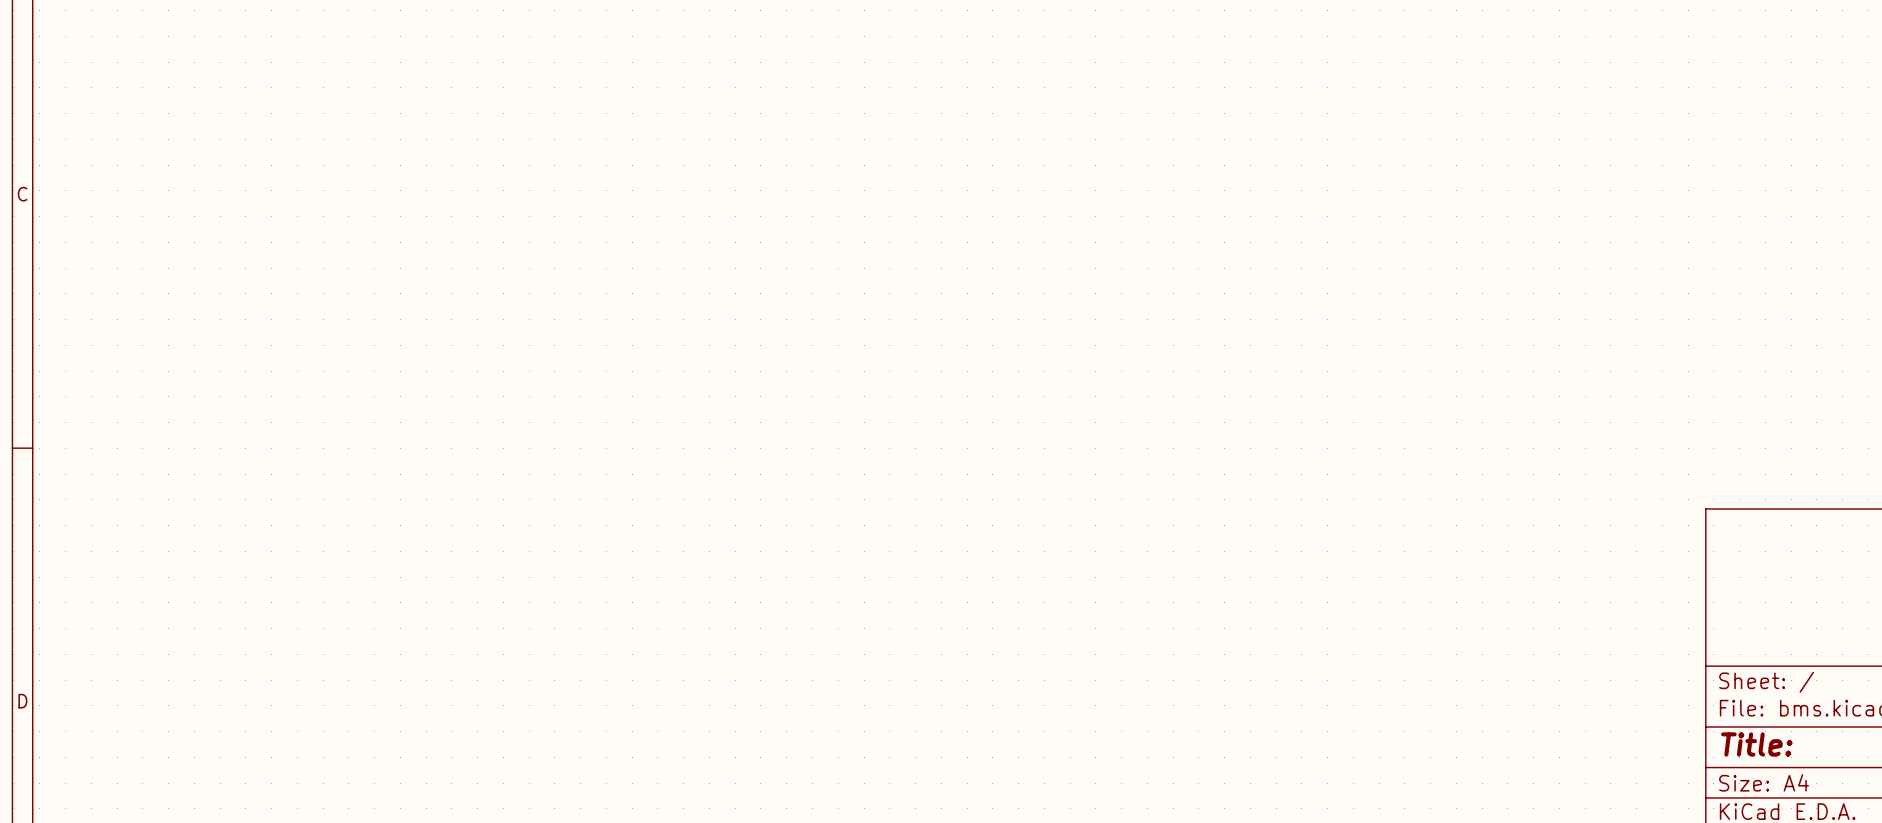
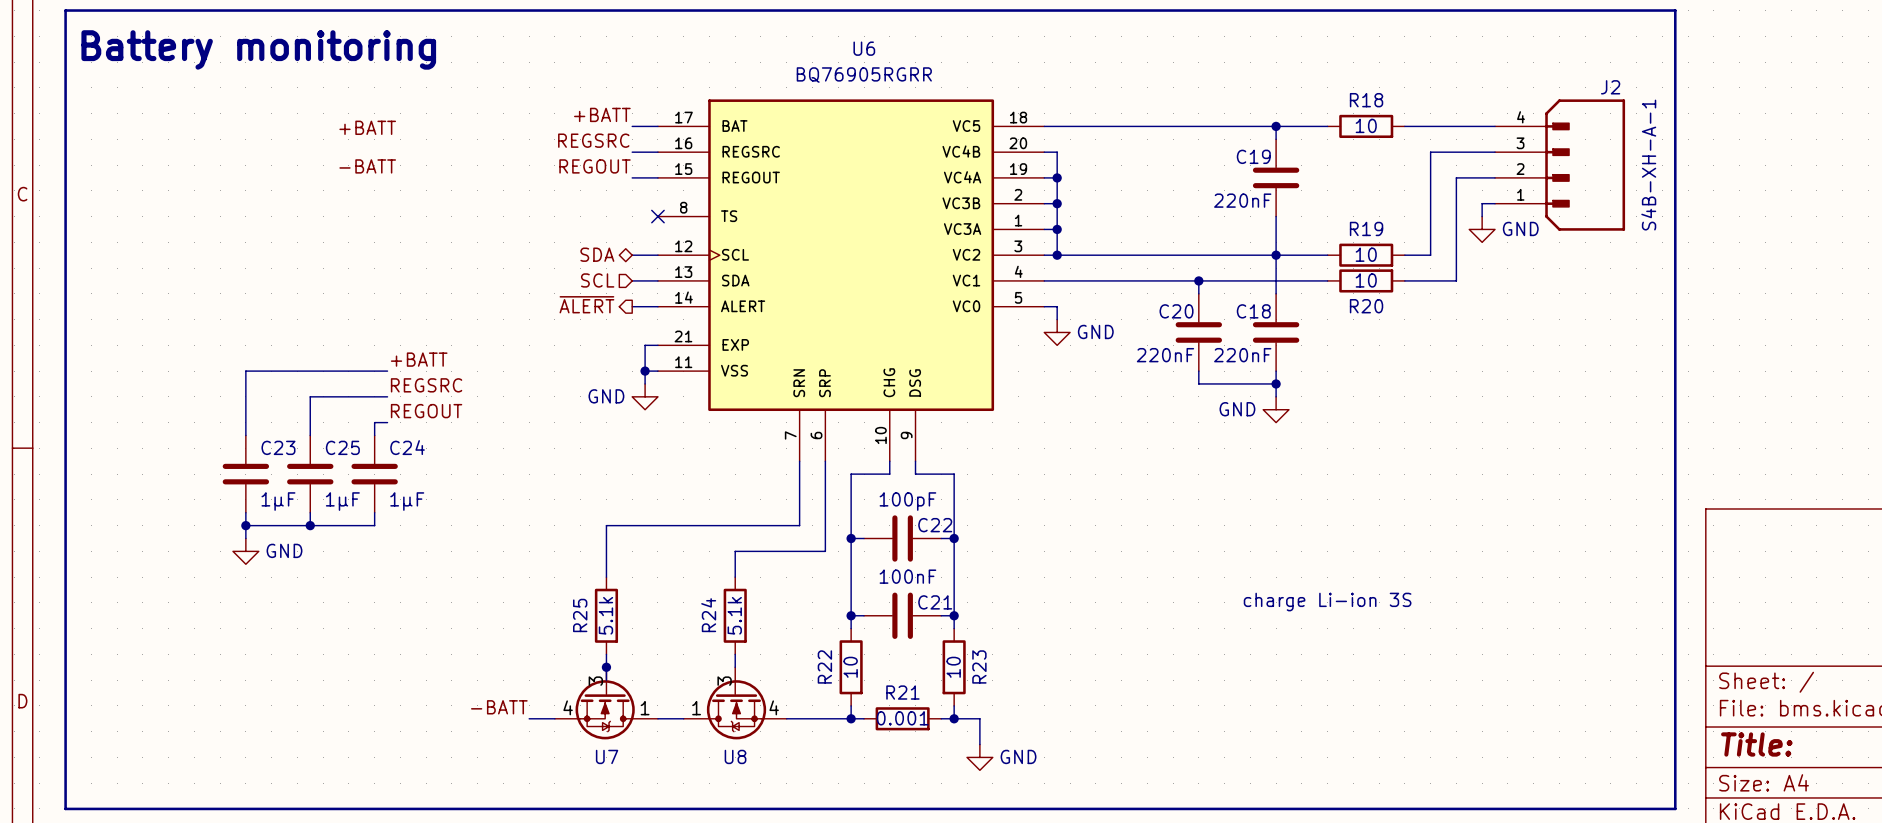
line: none -> (65, 10) (1675, 10) (1675, 808) (65, 808) (65, 10)
text: none -> Battery monitoring (258, 49)
label: none -> +BATT (602, 114)
wire: none -> (632, 126) (657, 126)
wire: none -> (1044, 126) (1327, 126)
wire: none -> (1276, 126) (1276, 139)
junction: none -> (1276, 126)
R18: none -> 10 (1366, 126)
wire: none -> (1404, 126) (1495, 126)
label: none -> +BATT (367, 127)
label: none -> REGSRC (593, 140)
wire: none -> (632, 152) (657, 152)
wire: none -> (1044, 152) (1057, 152) (1057, 255)
wire: none -> (1495, 152) (1430, 152) (1430, 255) (1404, 255)
J2: none -> S4B-XH-A-1 (1560, 165)
label: none -> -BATT (367, 166)
label: none -> REGOUT (595, 166)
wire: none -> (632, 177) (657, 177)
wire: none -> (1044, 177) (1057, 177)
junction: none -> (1057, 177)
C19: none -> 220nF (1276, 177)
wire: none -> (1495, 177) (1456, 177) (1456, 280) (1404, 280)
wire: none -> (1044, 203) (1057, 203)
junction: none -> (1057, 203)
wire: none -> (1495, 203) (1482, 203) (1482, 216)
no-connect mark: none -> (657, 216)
wire: none -> (1276, 216) (1276, 293)
wire: none -> (1044, 229) (1057, 229)
junction: none -> (1057, 229)
power symbol: none -> GND (1482, 229)
hierarchical label: none -> SDA (597, 254)
wire: none -> (632, 255) (657, 255)
wire: none -> (1044, 255) (1327, 255)
junction: none -> (1057, 255)
junction: none -> (1276, 255)
R19: none -> 10 (1366, 255)
hierarchical label: none -> SCL (597, 280)
wire: none -> (632, 280) (657, 280)
U6: none -> BQ76905RGRR (851, 280)
wire: none -> (1044, 280) (1327, 280)
wire: none -> (1198, 280) (1198, 293)
junction: none -> (1198, 280)
R20: none -> 10 (1366, 280)
hierarchical label: none -> ~{ALERT} (586, 304)
wire: none -> (632, 306) (657, 306)
wire: none -> (1044, 306) (1057, 306) (1057, 319)
power symbol: none -> GND (1057, 332)
C20: none -> 220nF (1198, 332)
C18: none -> 220nF (1276, 332)
wire: none -> (657, 345) (645, 345) (645, 383)
label: none -> +BATT (419, 359)
wire: none -> (387, 371) (245, 371) (245, 435)
wire: none -> (645, 371) (657, 371)
junction: none -> (645, 371)
wire: none -> (1198, 371) (1198, 383) (1276, 383)
wire: none -> (1276, 371) (1276, 396)
junction: none -> (1276, 383)
label: none -> REGSRC (426, 385)
wire: none -> (387, 396) (310, 396) (310, 435)
power symbol: none -> GND (645, 396)
power symbol: none -> GND (1276, 409)
label: none -> REGOUT (426, 411)
wire: none -> (387, 422) (374, 422) (374, 435)
wire: none -> (799, 461) (799, 525) (606, 525) (606, 577)
wire: none -> (825, 461) (825, 551) (735, 551) (735, 577)
wire: none -> (889, 461) (889, 474) (851, 474) (851, 628)
wire: none -> (915, 461) (915, 474) (954, 474) (954, 628)
C23: none -> 1µF (245, 474)
C25: none -> 1µF (310, 474)
C24: none -> 1µF (374, 474)
wire: none -> (245, 512) (245, 538)
wire: none -> (310, 512) (310, 525)
wire: none -> (374, 512) (374, 525) (245, 525)
junction: none -> (245, 525)
junction: none -> (310, 525)
wire: none -> (851, 538) (864, 538)
junction: none -> (851, 538)
C22: none -> 100pF (902, 538)
wire: none -> (941, 538) (954, 538)
junction: none -> (954, 538)
power symbol: none -> GND (245, 551)
text: none -> charge Li-ion 3S (1327, 602)
R25: none -> 5.1k (606, 615)
R24: none -> 5.1k (735, 615)
wire: none -> (851, 615) (864, 615)
junction: none -> (851, 615)
C21: none -> 100nF (902, 615)
wire: none -> (941, 615) (954, 615)
junction: none -> (954, 615)
wire: none -> (606, 654) (606, 680)
wire: none -> (735, 654) (735, 667)
junction: none -> (606, 667)
R22: none -> 10 (851, 667)
R23: none -> 10 (954, 667)
U7: none -> (606, 703)
U8: none -> (735, 703)
wire: none -> (851, 705) (851, 718)
wire: none -> (954, 705) (954, 718)
label: none -> -BATT (499, 707)
wire: none -> (529, 718) (554, 718)
wire: none -> (657, 718) (683, 718)
wire: none -> (786, 718) (864, 718)
junction: none -> (851, 718)
R21: none -> 0.001 (902, 718)
wire: none -> (941, 718) (979, 718) (979, 744)
junction: none -> (954, 718)
power symbol: none -> GND (979, 757)

